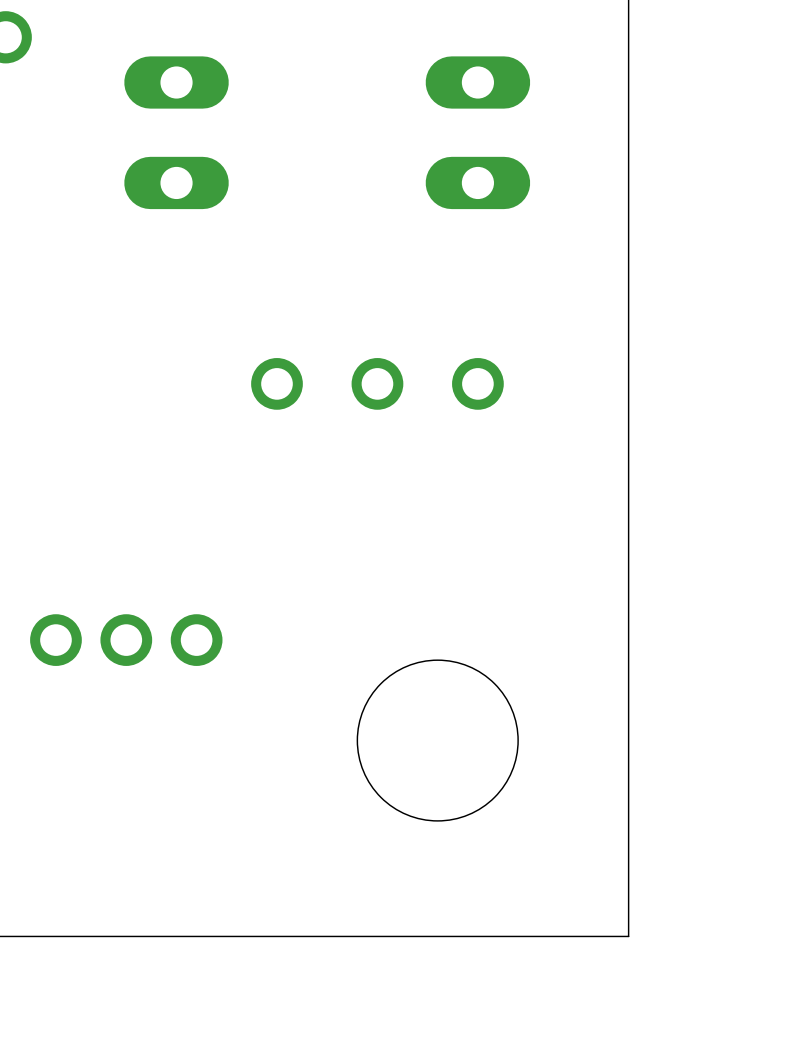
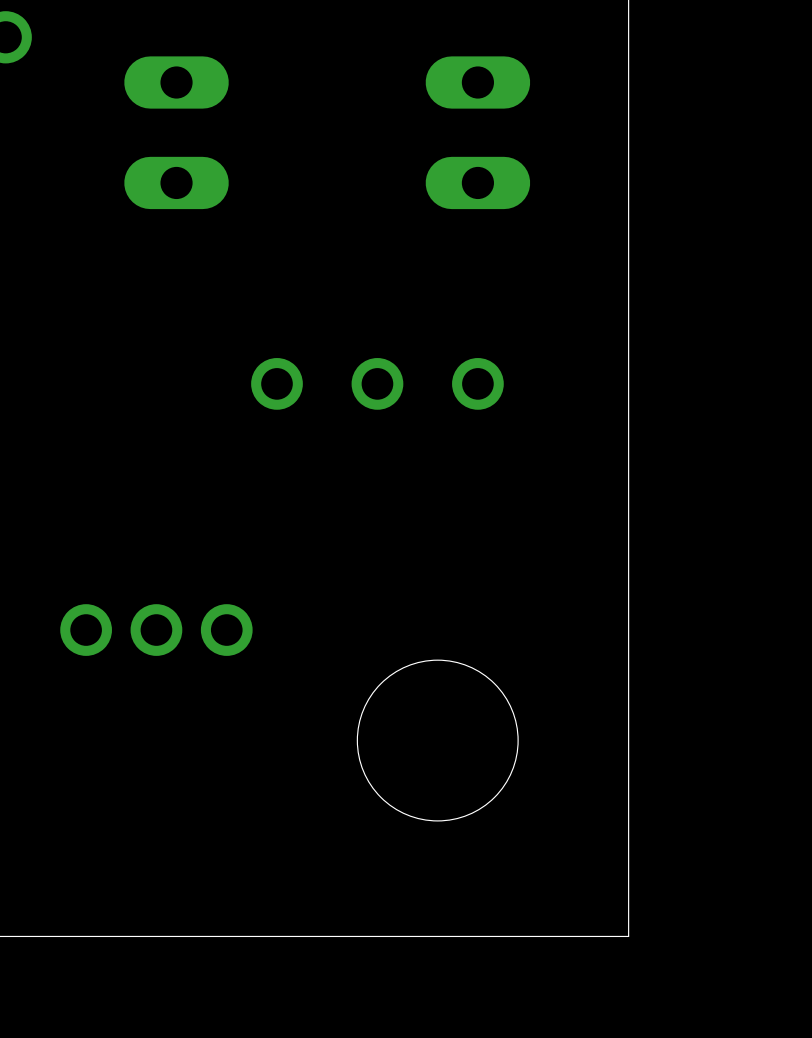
part position: (126, 640) -> (156, 630)

